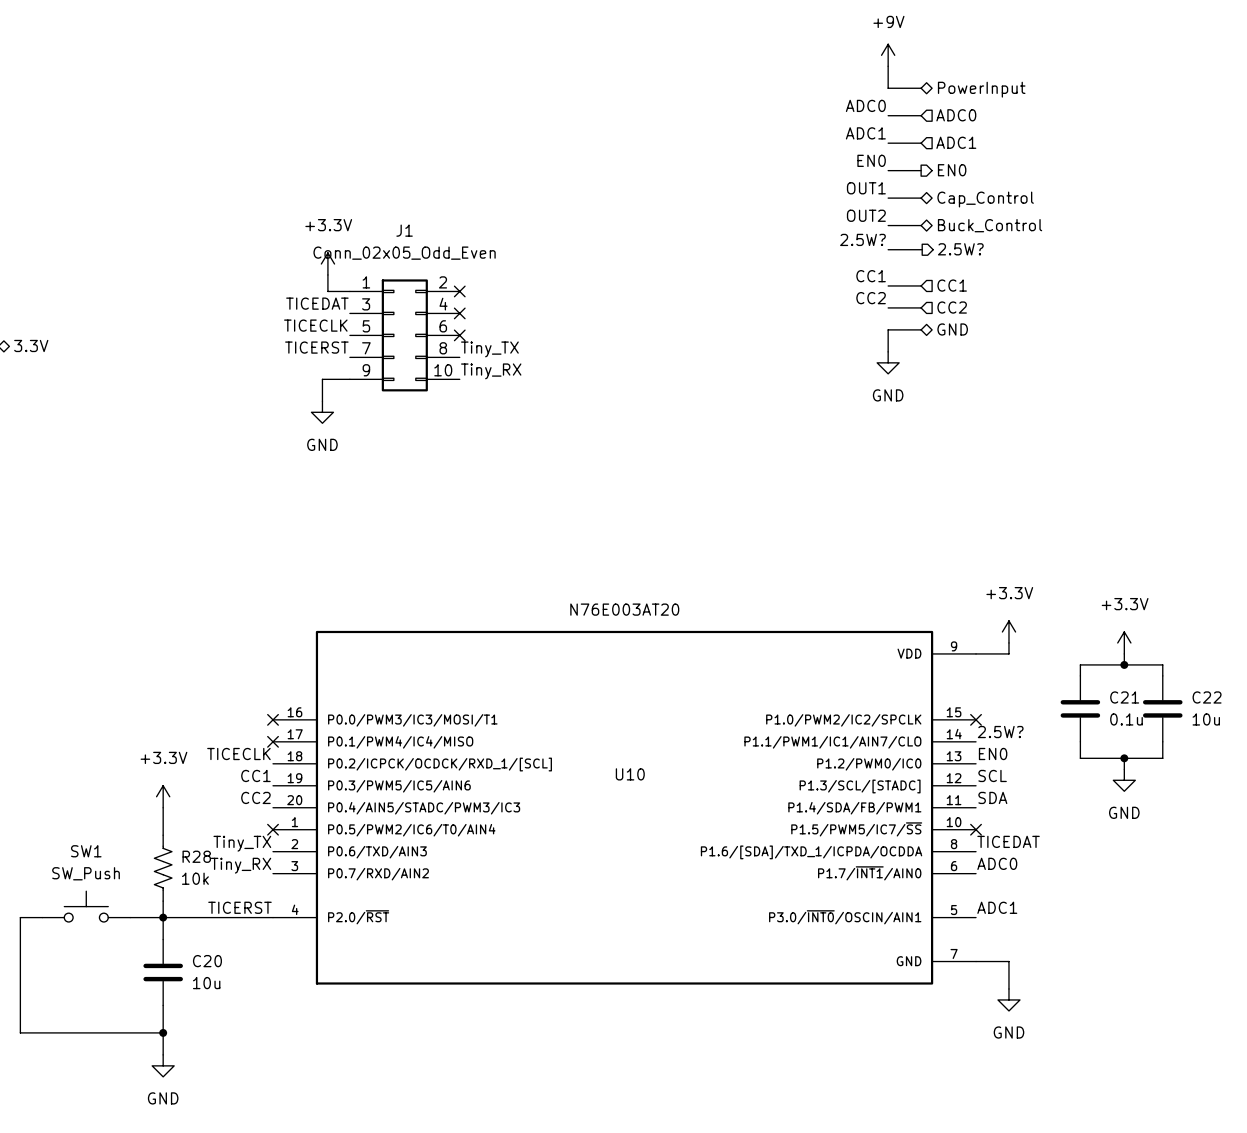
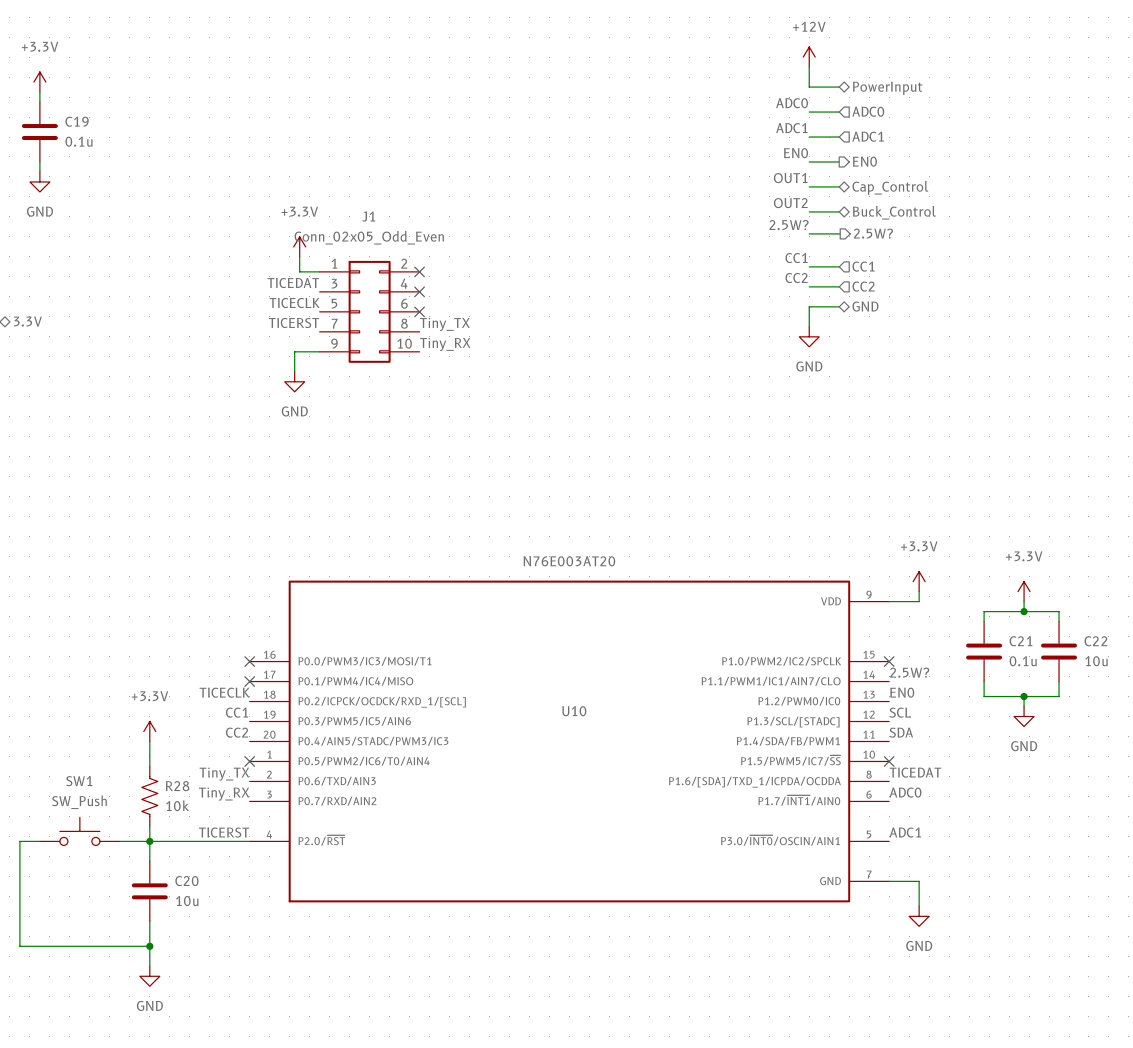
power symbol: +9V (888, 55) -> +12V (809, 57)
power symbol: none -> +3.3V (39, 82)
wire: none -> (39, 92) (39, 102)
C19: none -> 0.1u (39, 132)
wire: none -> (39, 161) (39, 171)
power symbol: none -> GND (39, 181)

